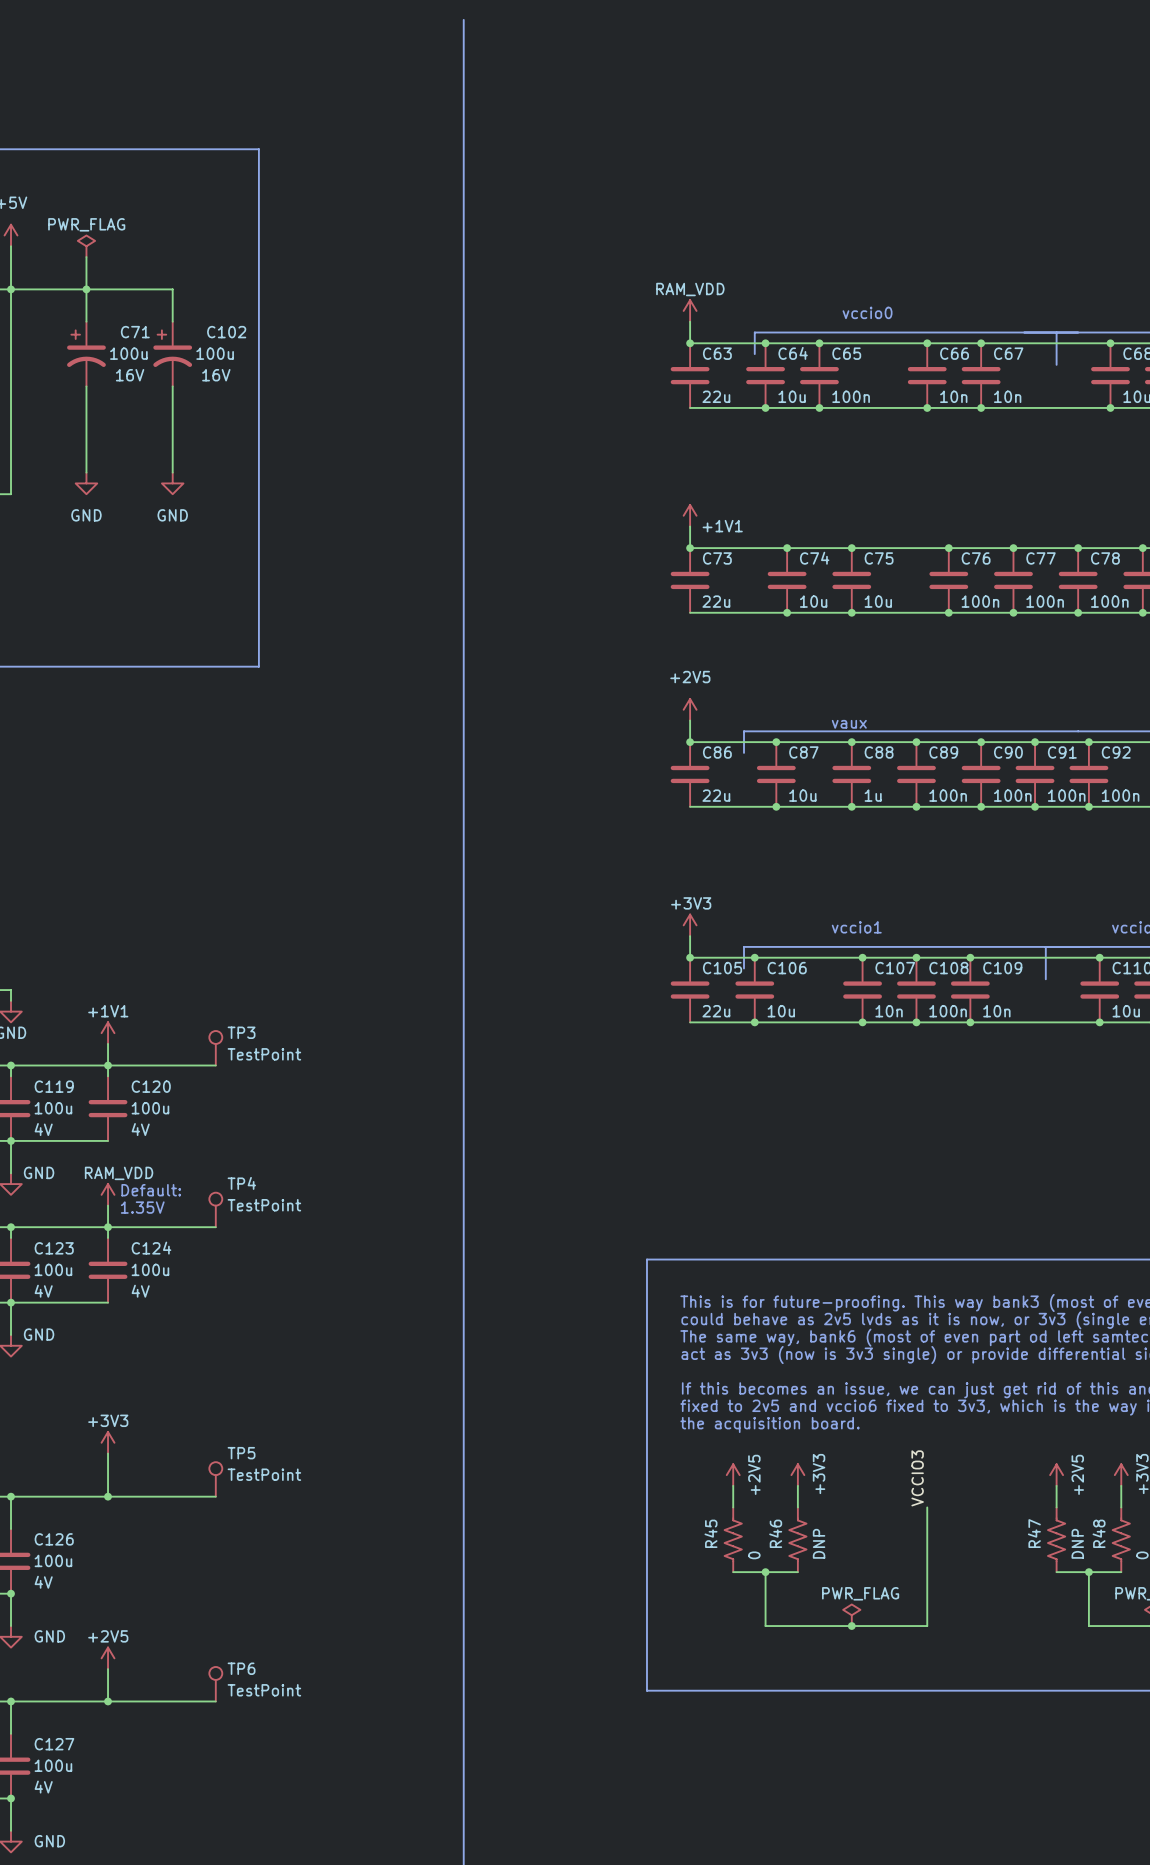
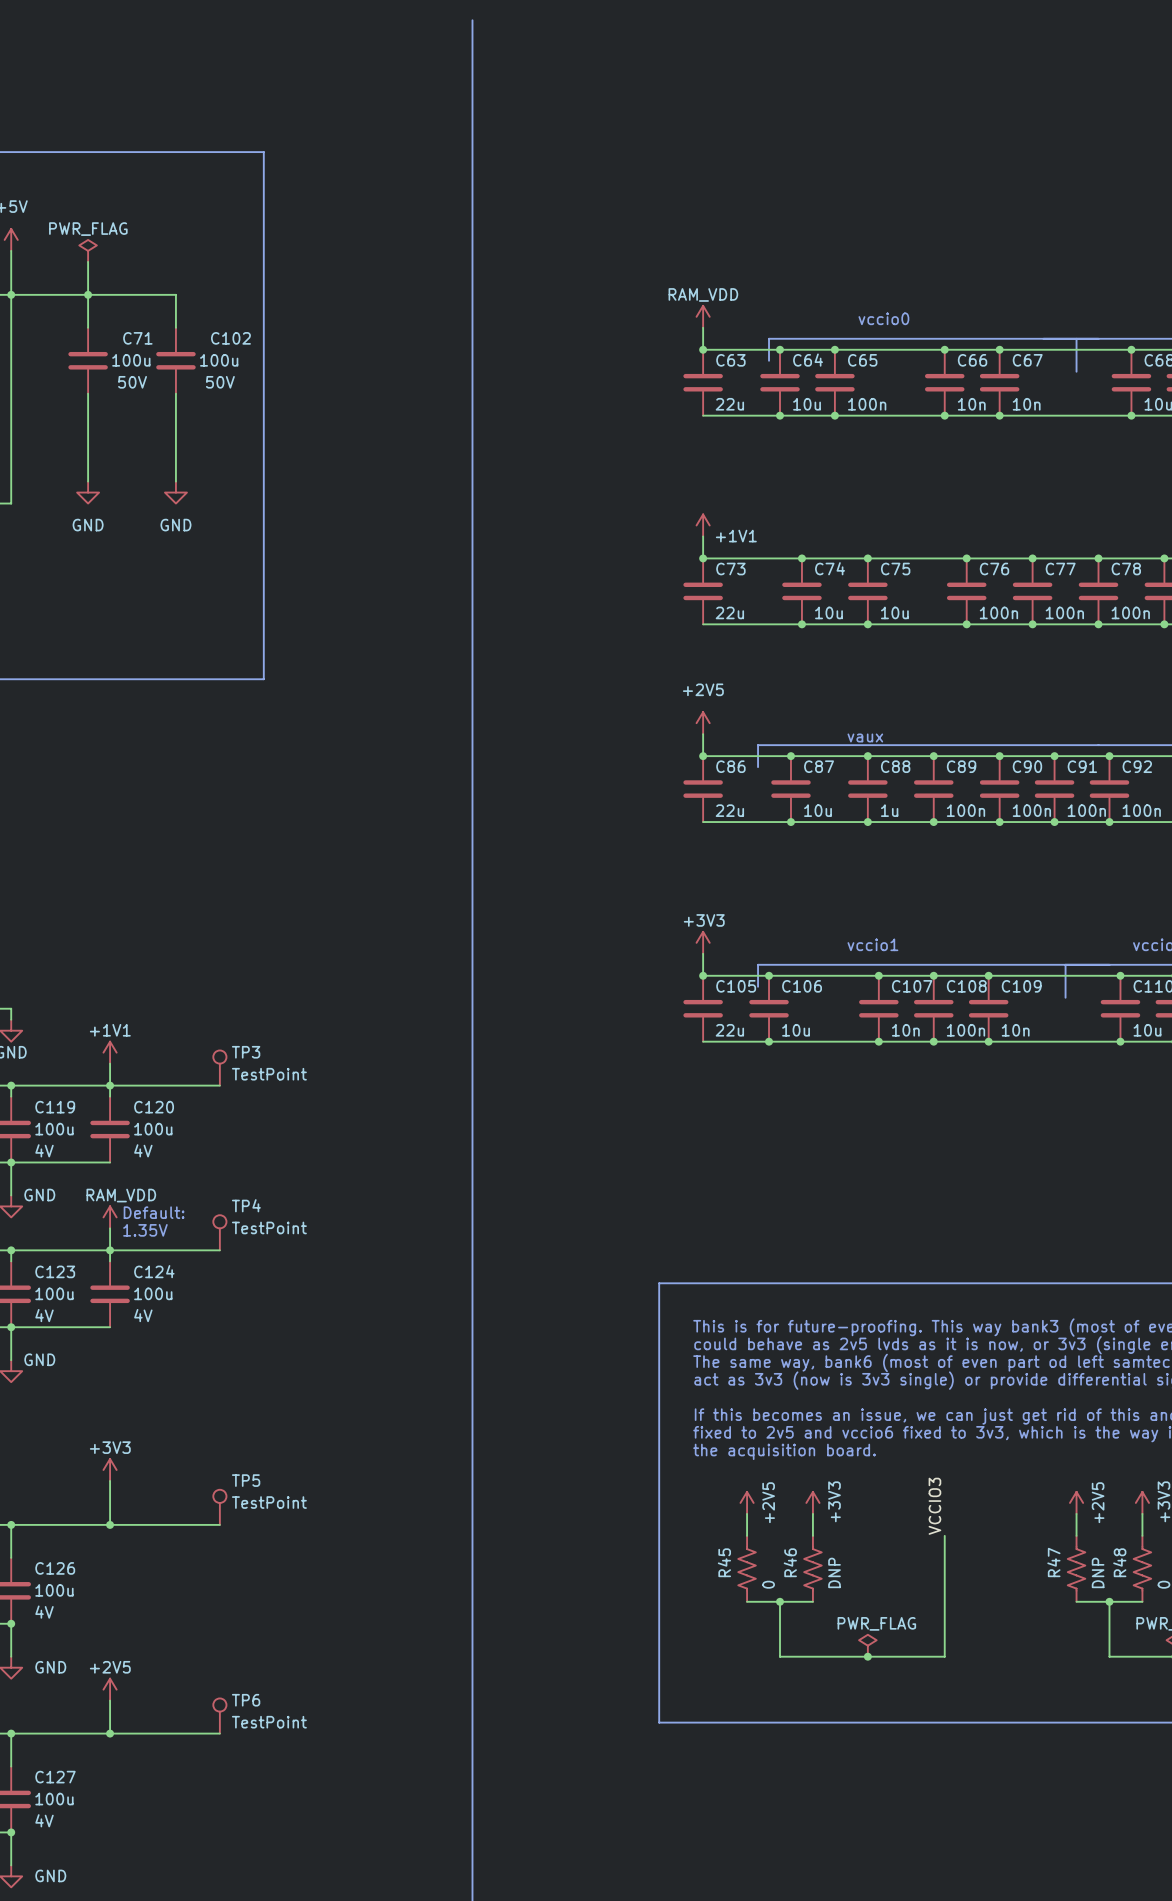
C71 symbol: [67, 321, 106, 387] -> [68, 327, 108, 394]
C102 symbol: [153, 321, 193, 387] -> [156, 327, 196, 394]
C71 text: 16V (130, 375) -> 50V (132, 382)
C102 text: 16V (216, 375) -> 50V (220, 382)

